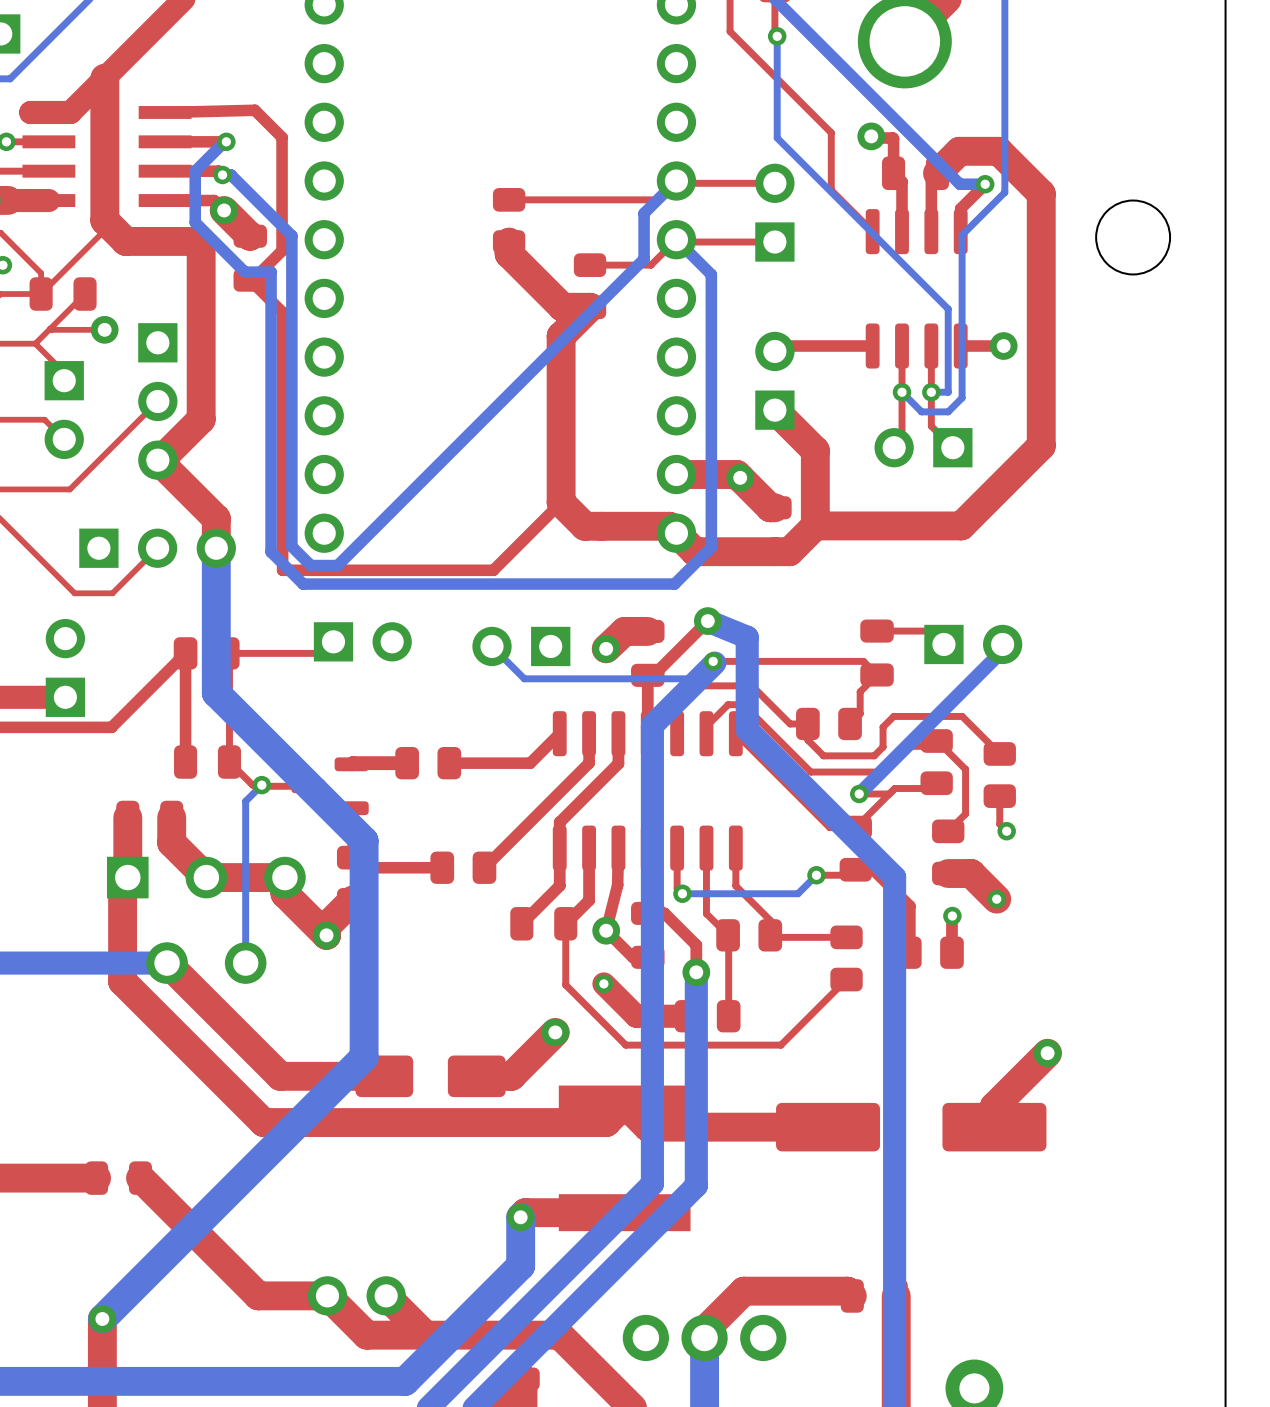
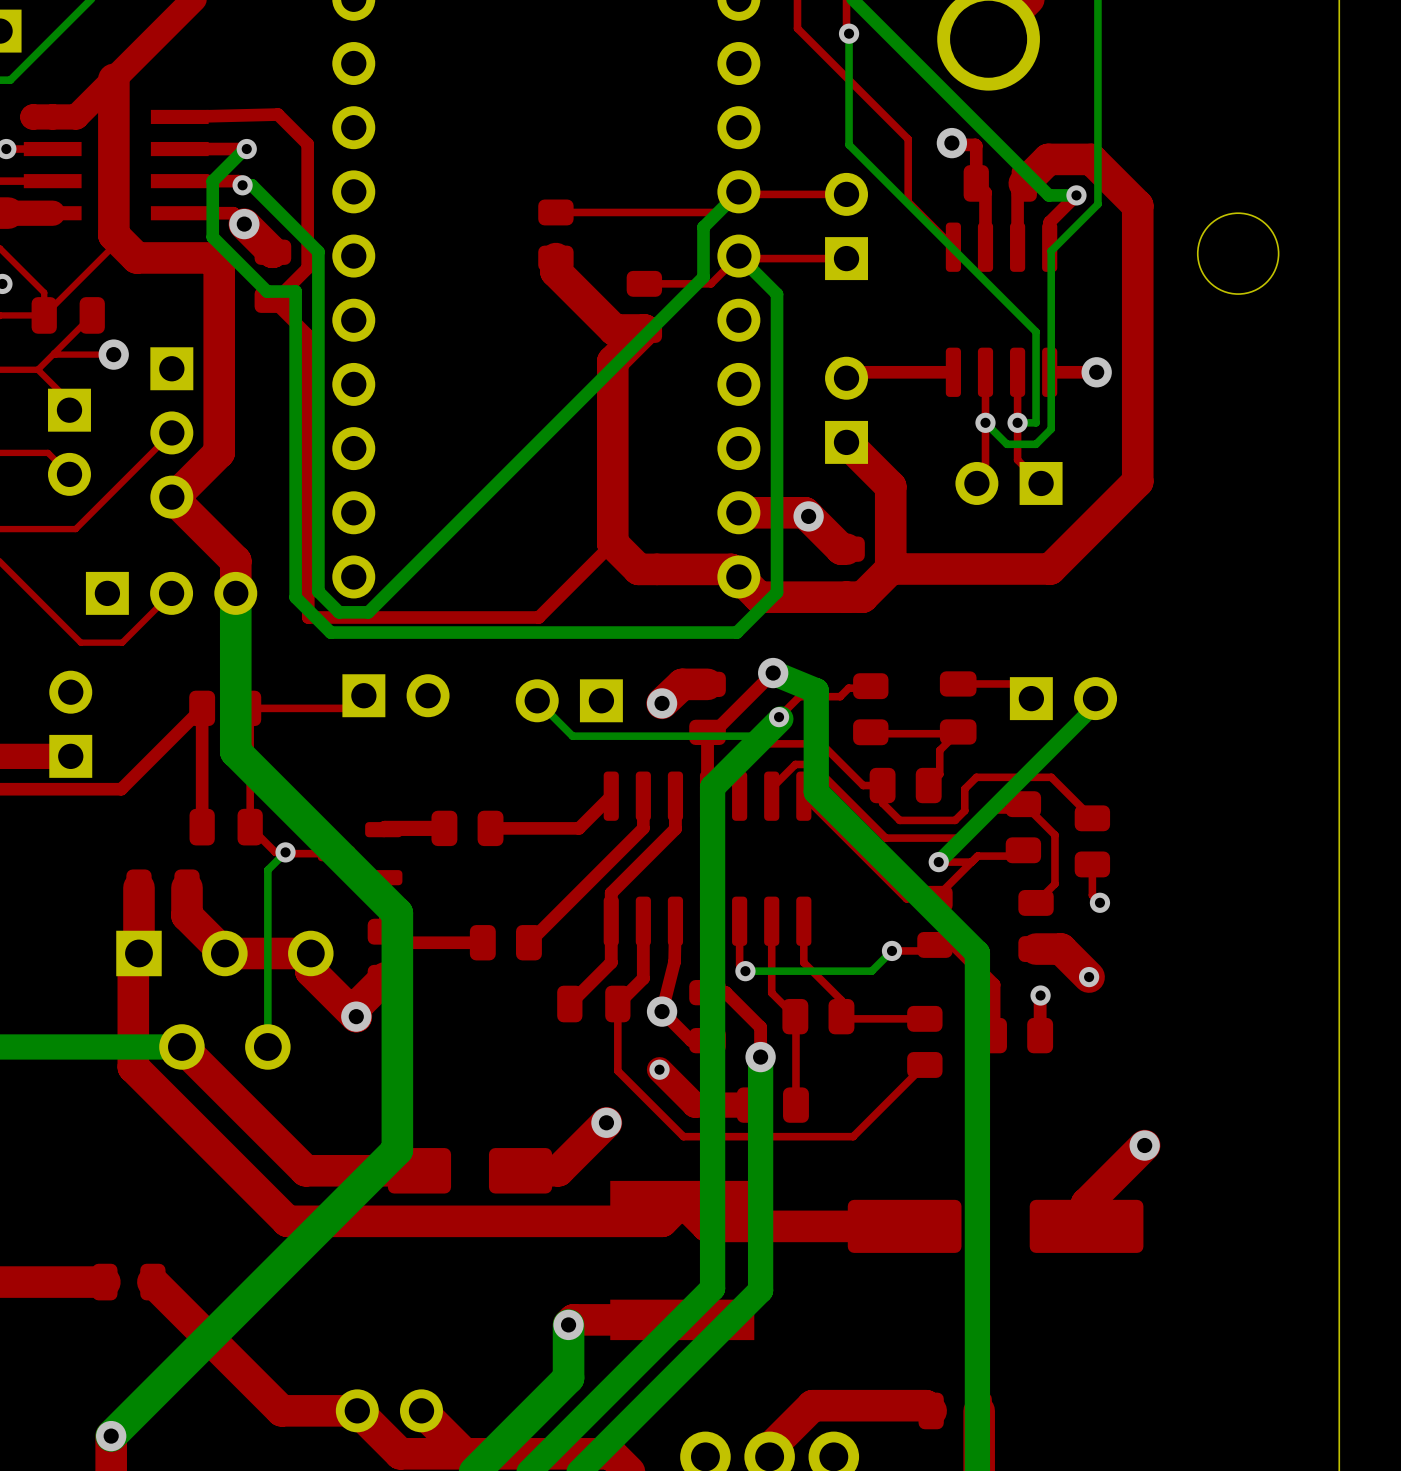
part: none -> (870, 709)
top track: (713, 661) (863, 661) (877, 674) -> (779, 717) (799, 696) (840, 696) (848, 688) (868, 688) (870, 686)
top track: none -> (870, 732) (956, 733)

